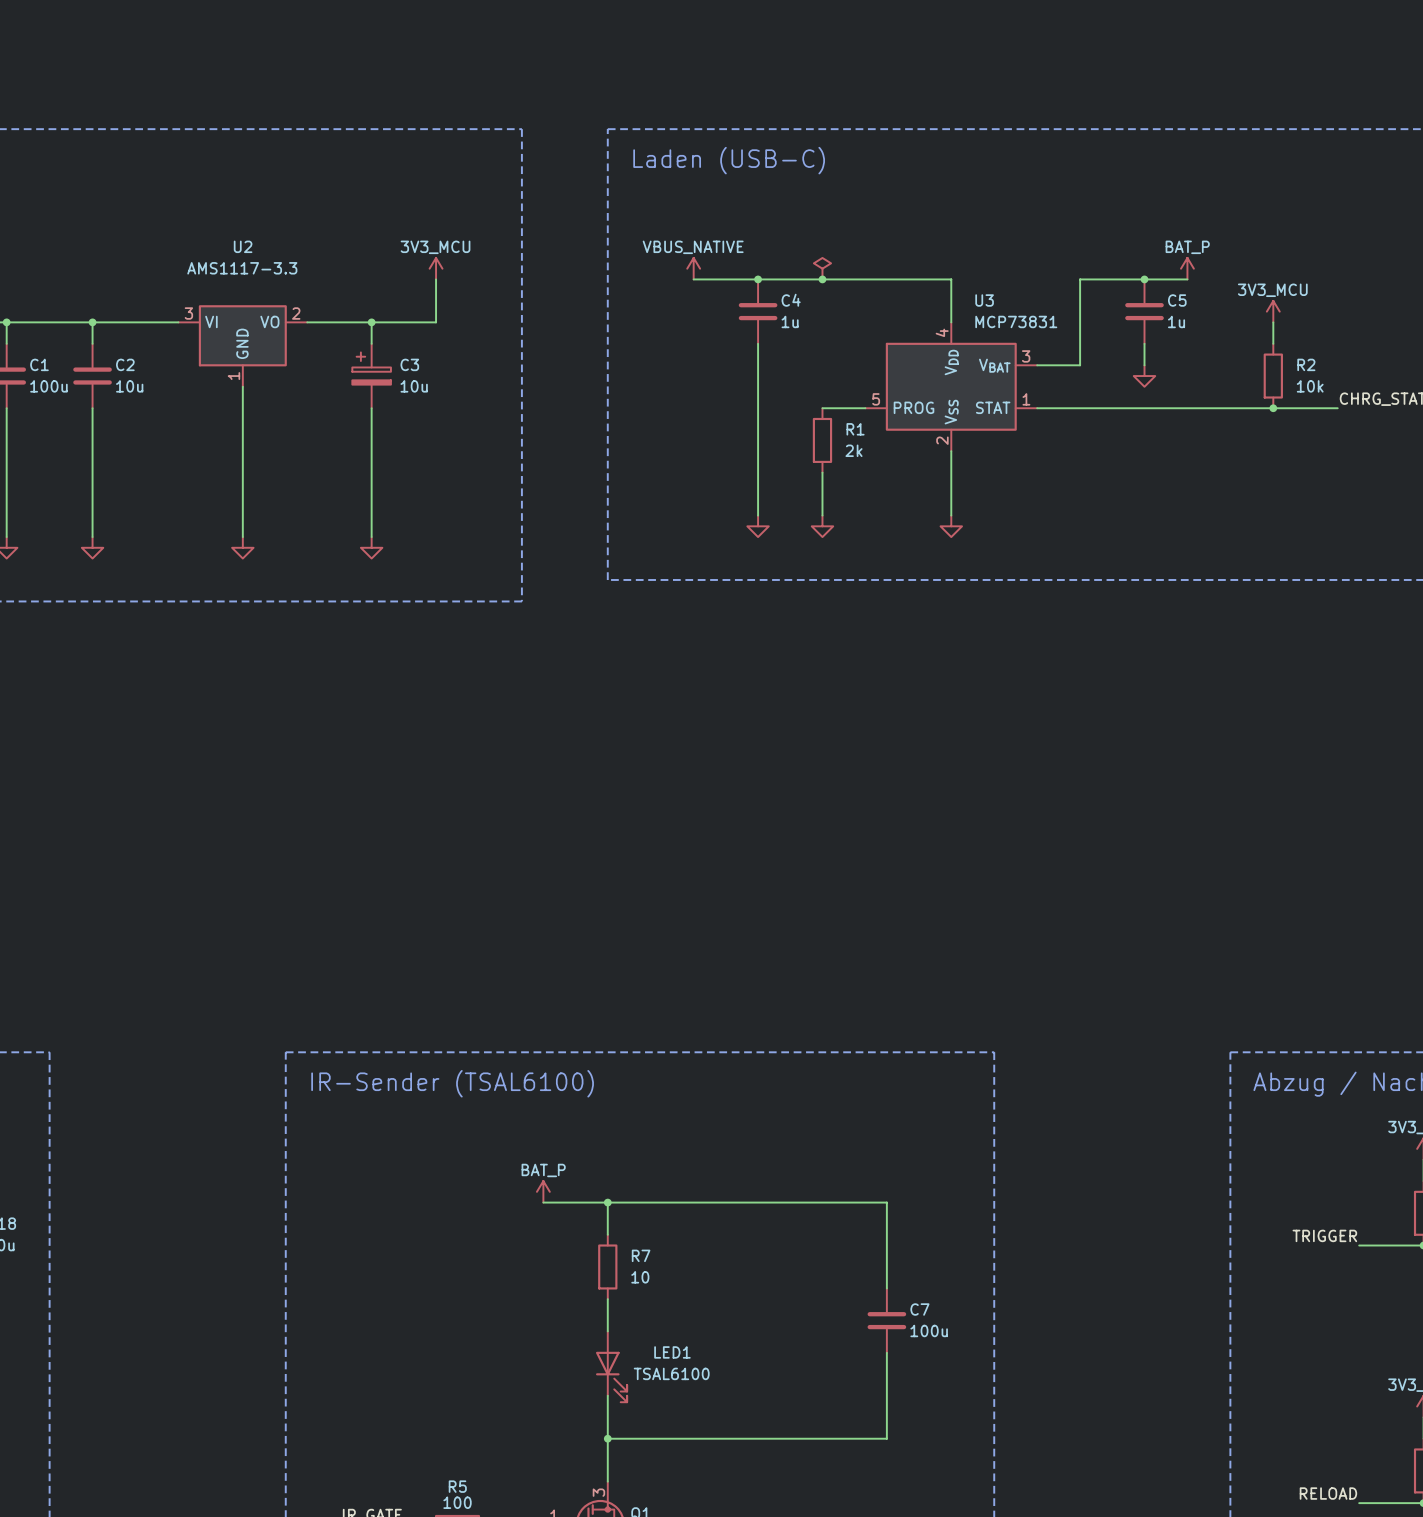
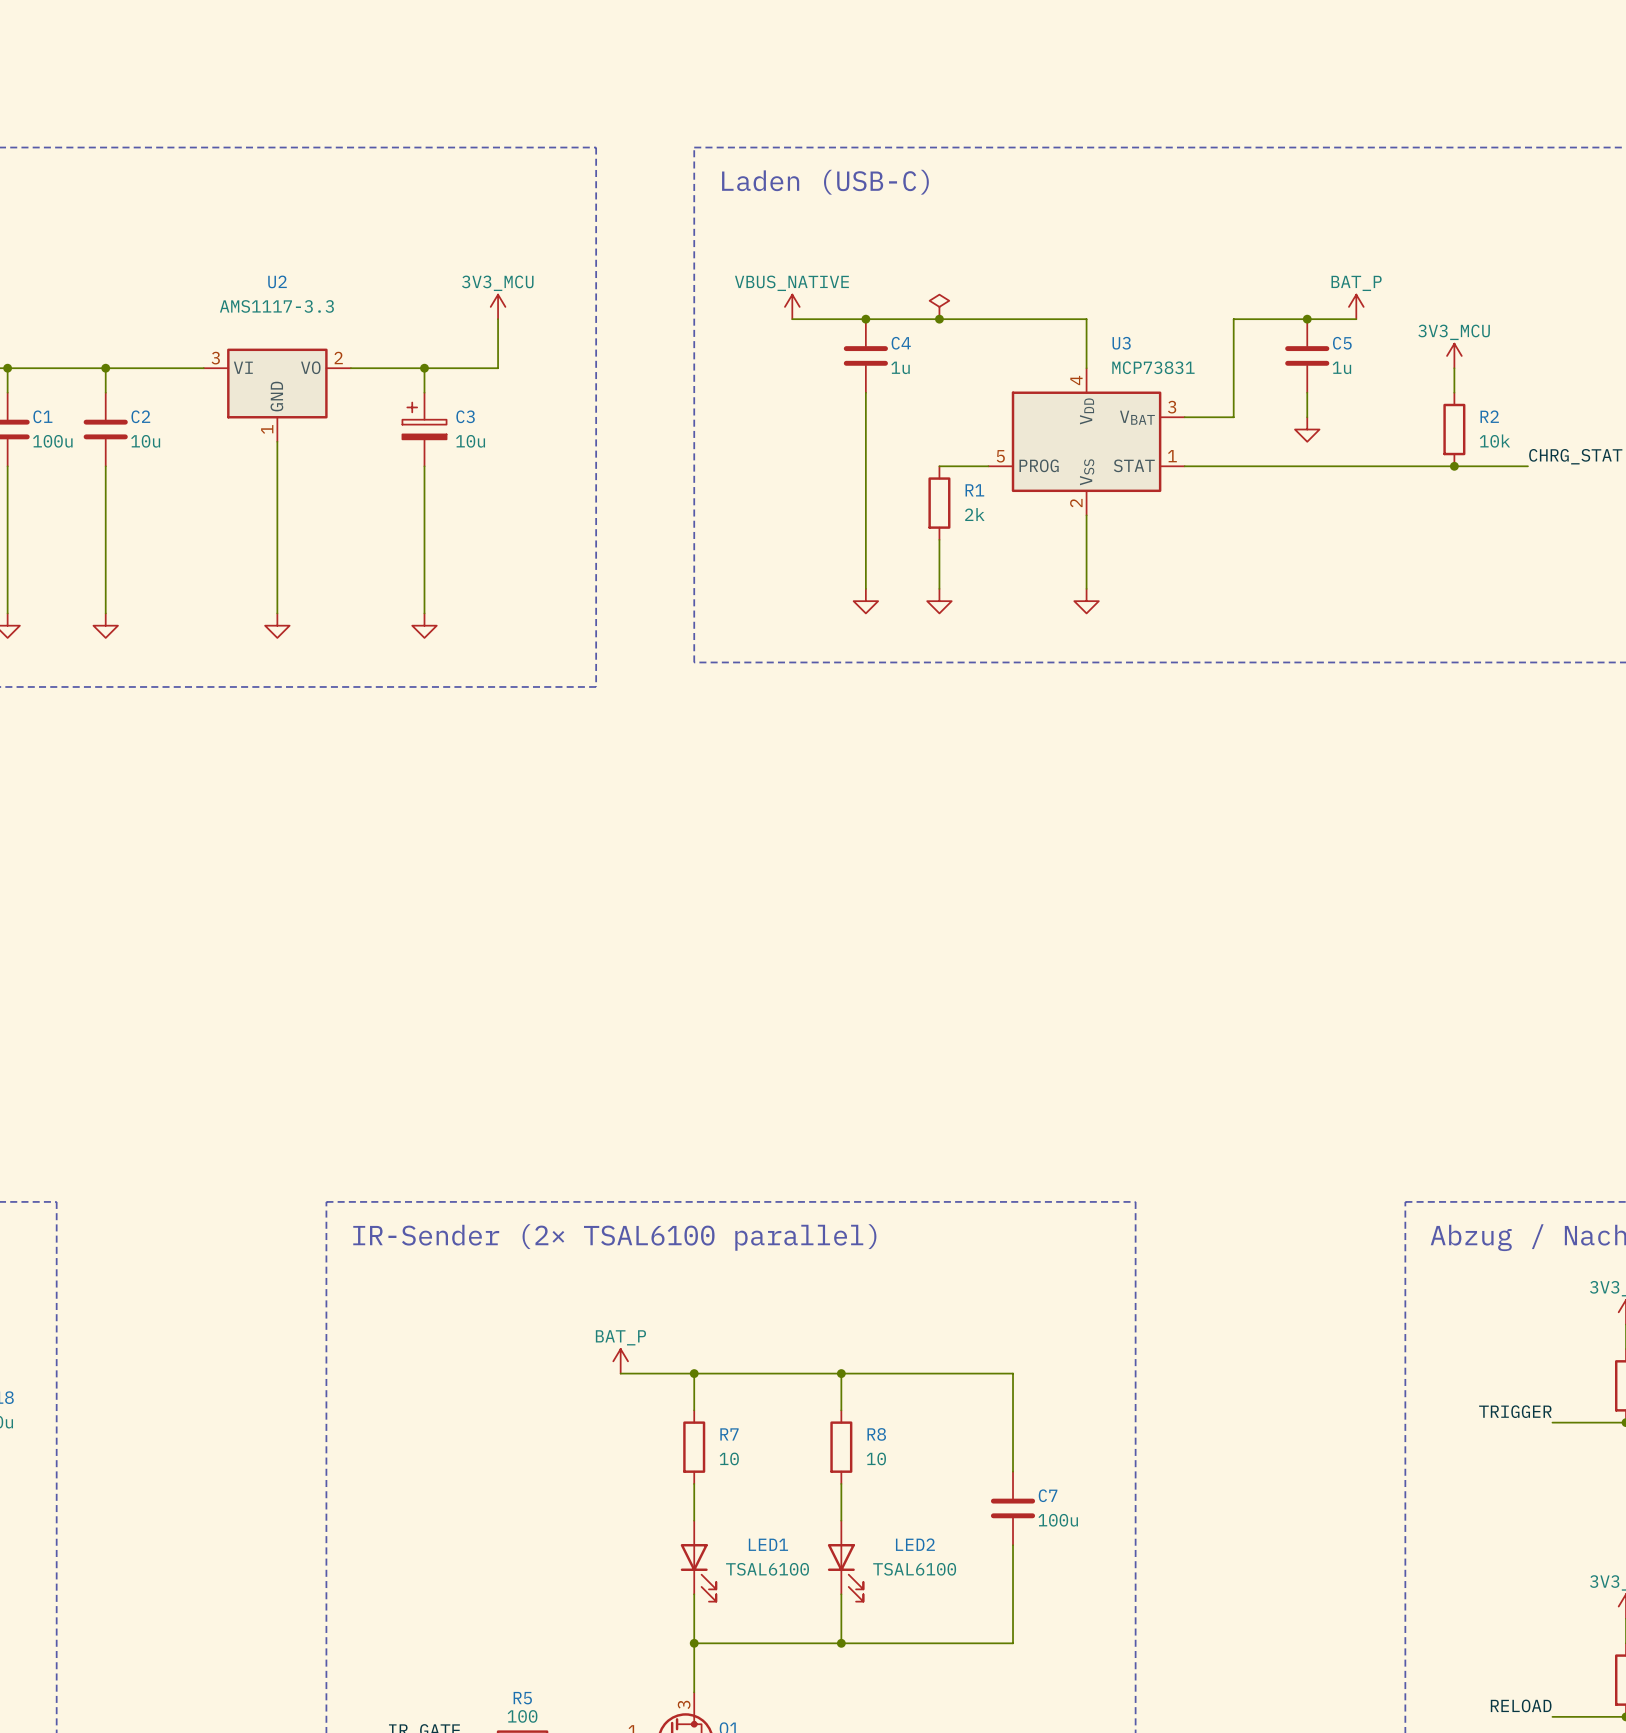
text: IR-Sender (TSAL6100) (452, 1083) -> IR-Sender (2× TSAL6100 parallel) (614, 1237)
wire: none -> (841, 1373) (841, 1410)
junction: none -> (841, 1373)
R8: none -> 10 (841, 1447)
wire: none -> (841, 1483) (841, 1520)
LED2: none -> TSAL6100 (845, 1561)
wire: none -> (841, 1594) (841, 1643)
junction: none -> (841, 1643)

